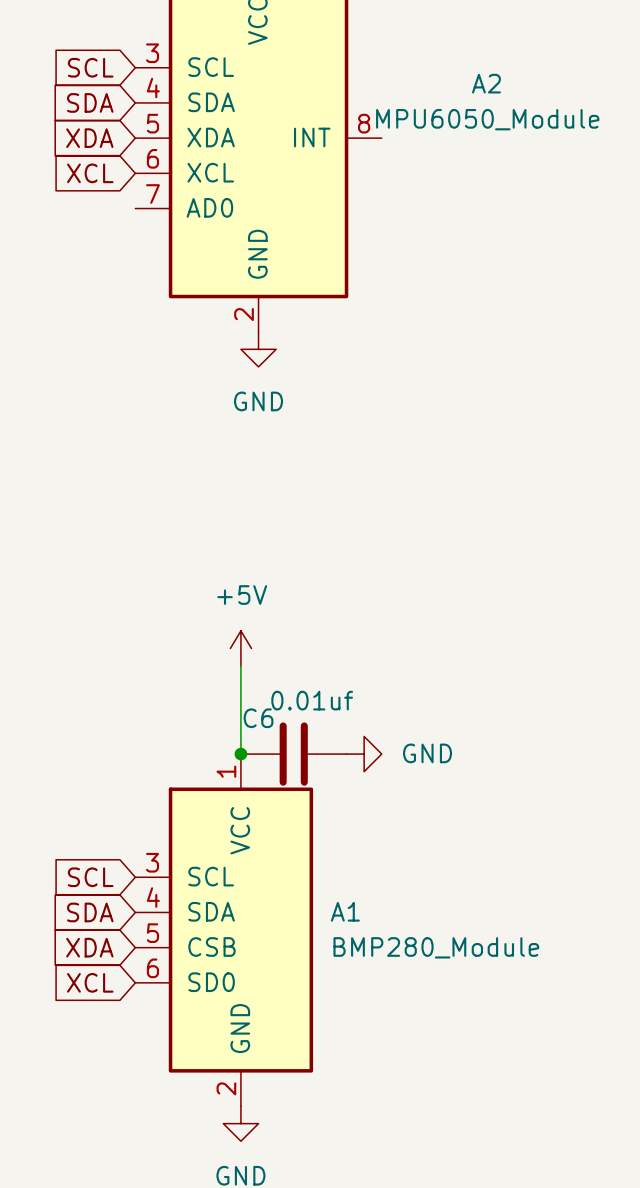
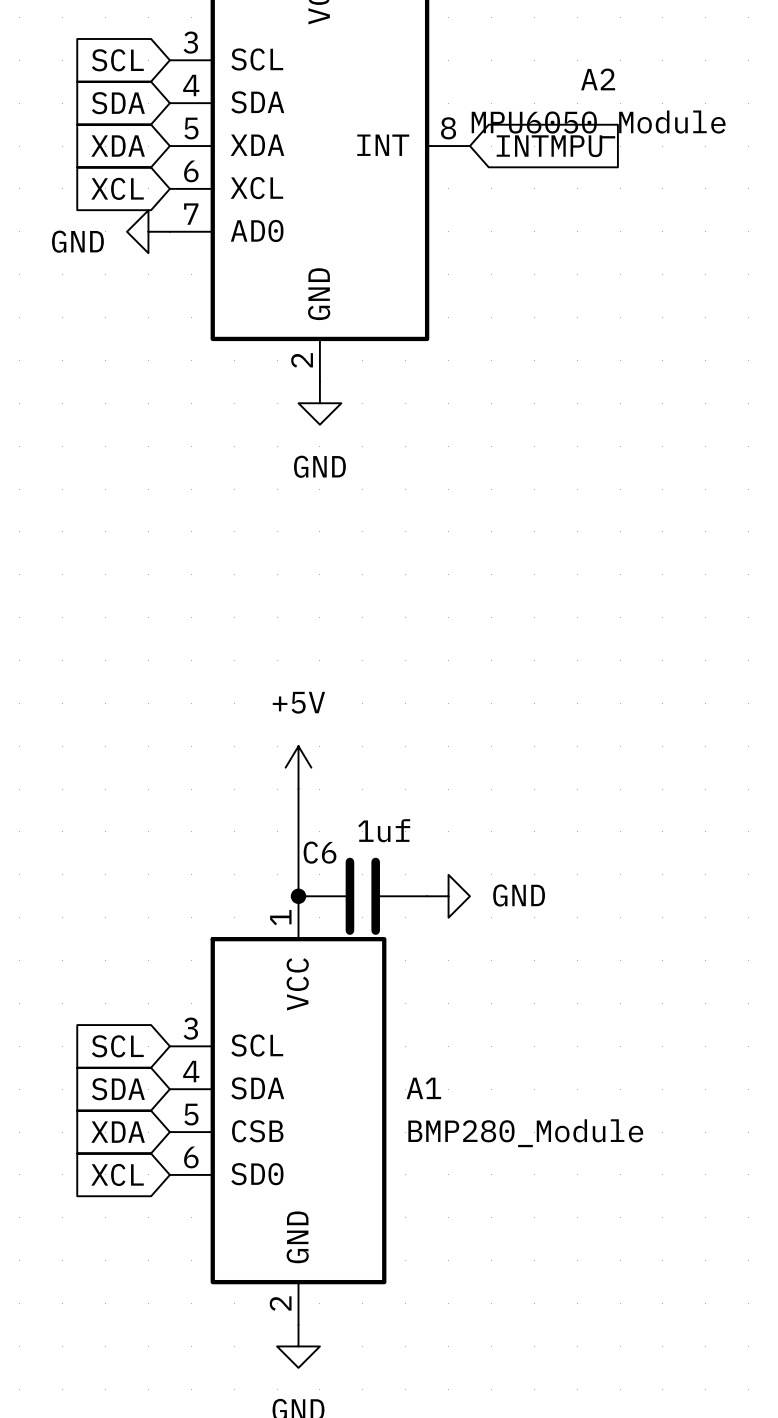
global label: none -> INTMPU (549, 146)
power symbol: none -> GND (148, 231)
C6 value: 0.01uf (312, 700) -> 1uf (384, 830)

